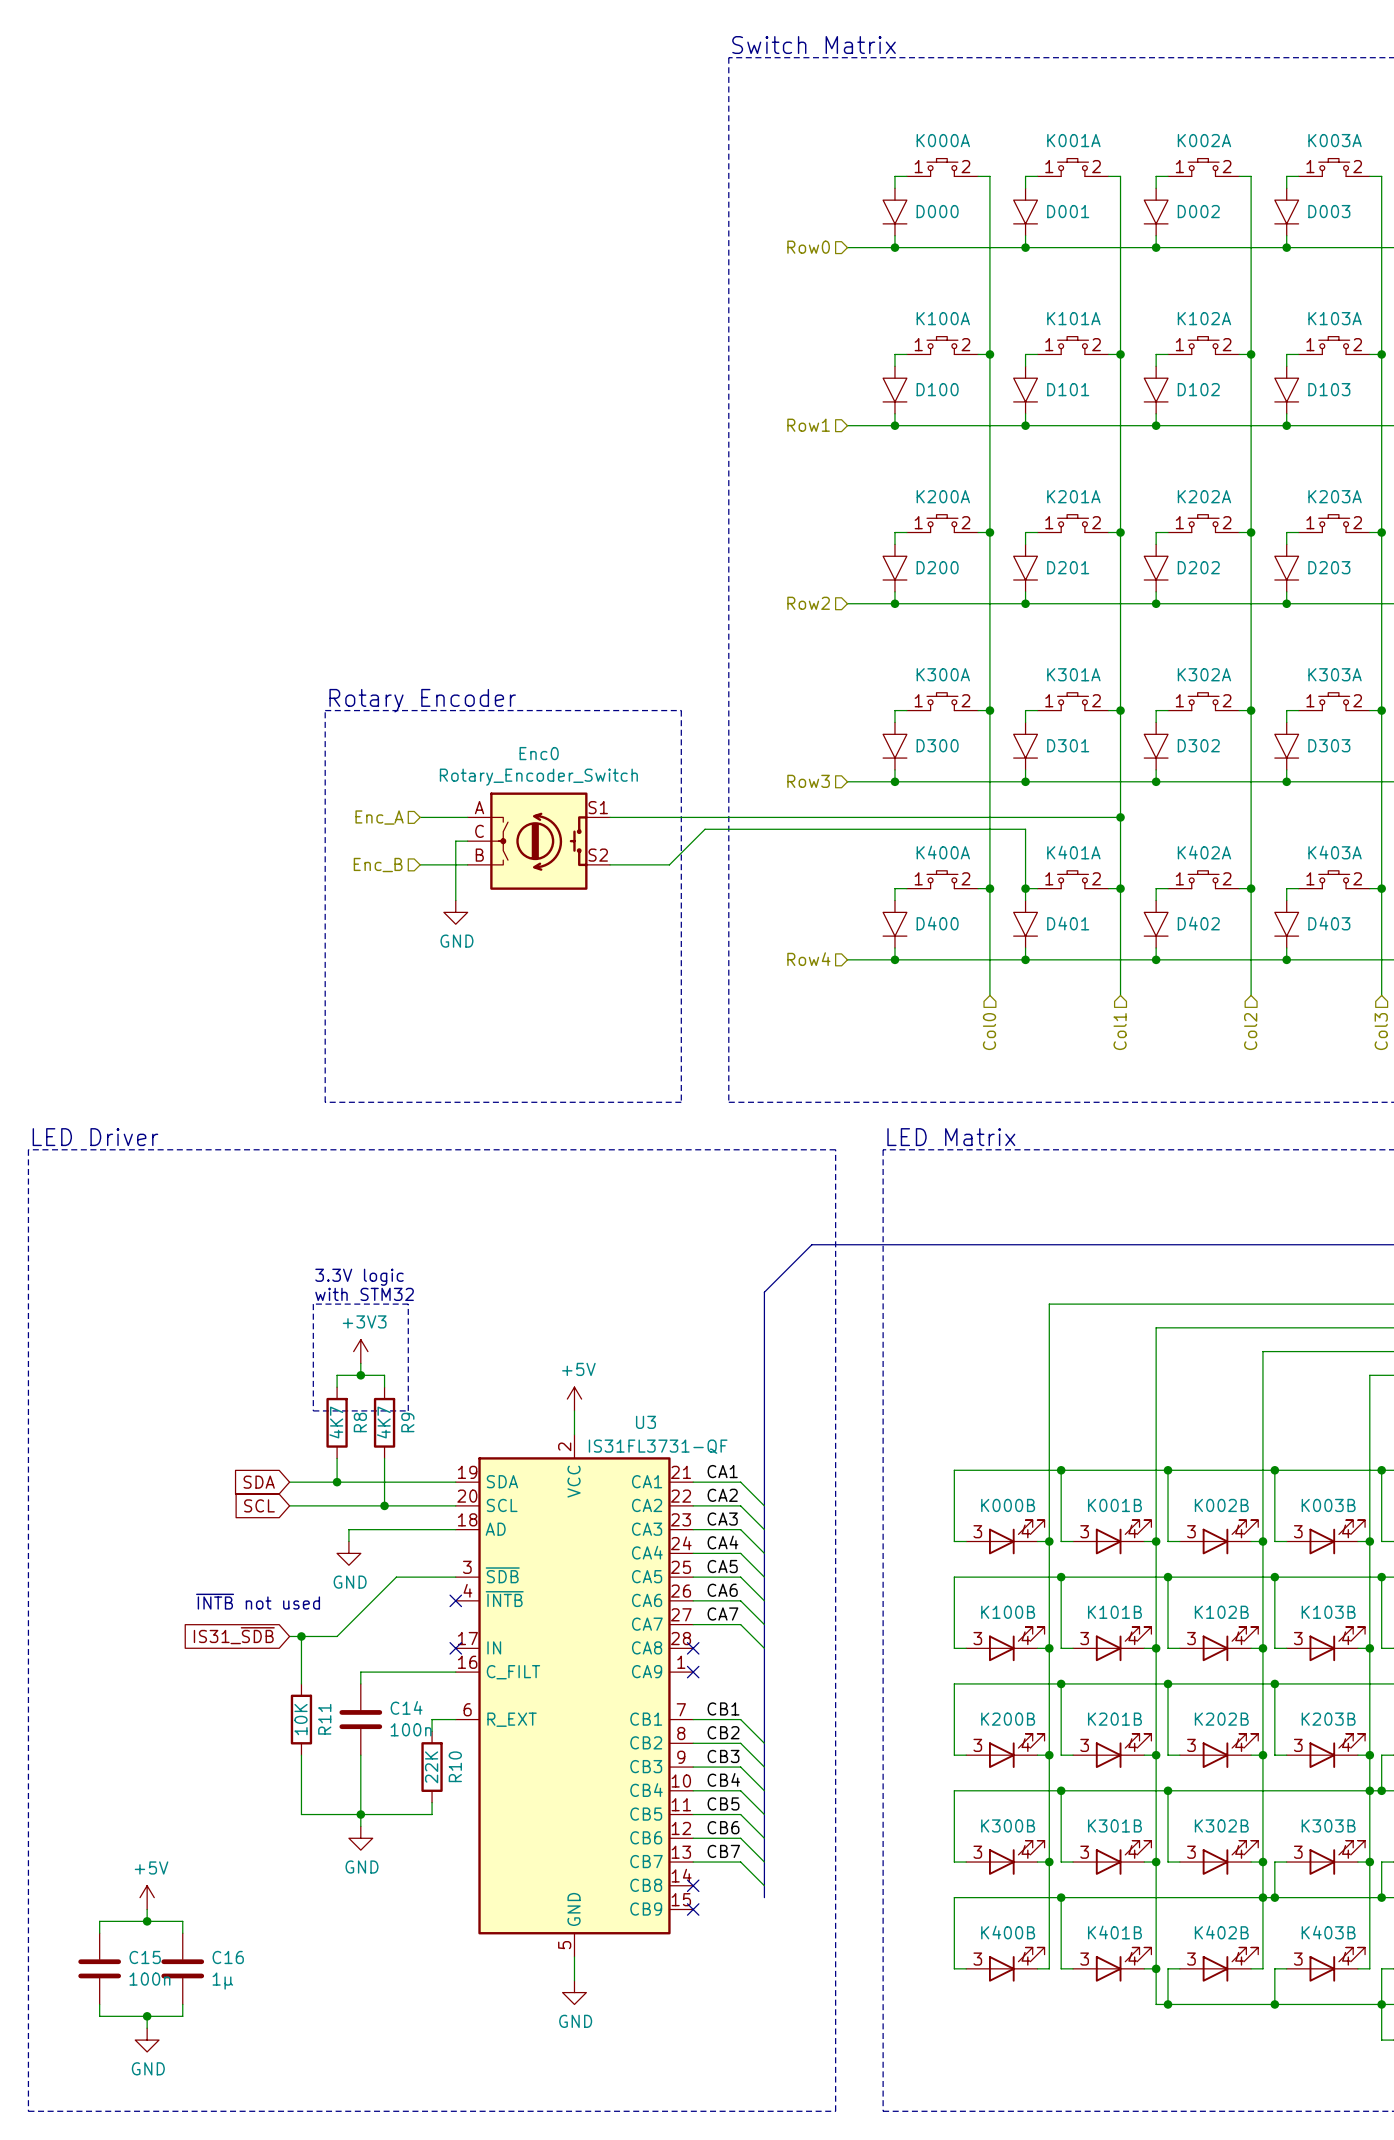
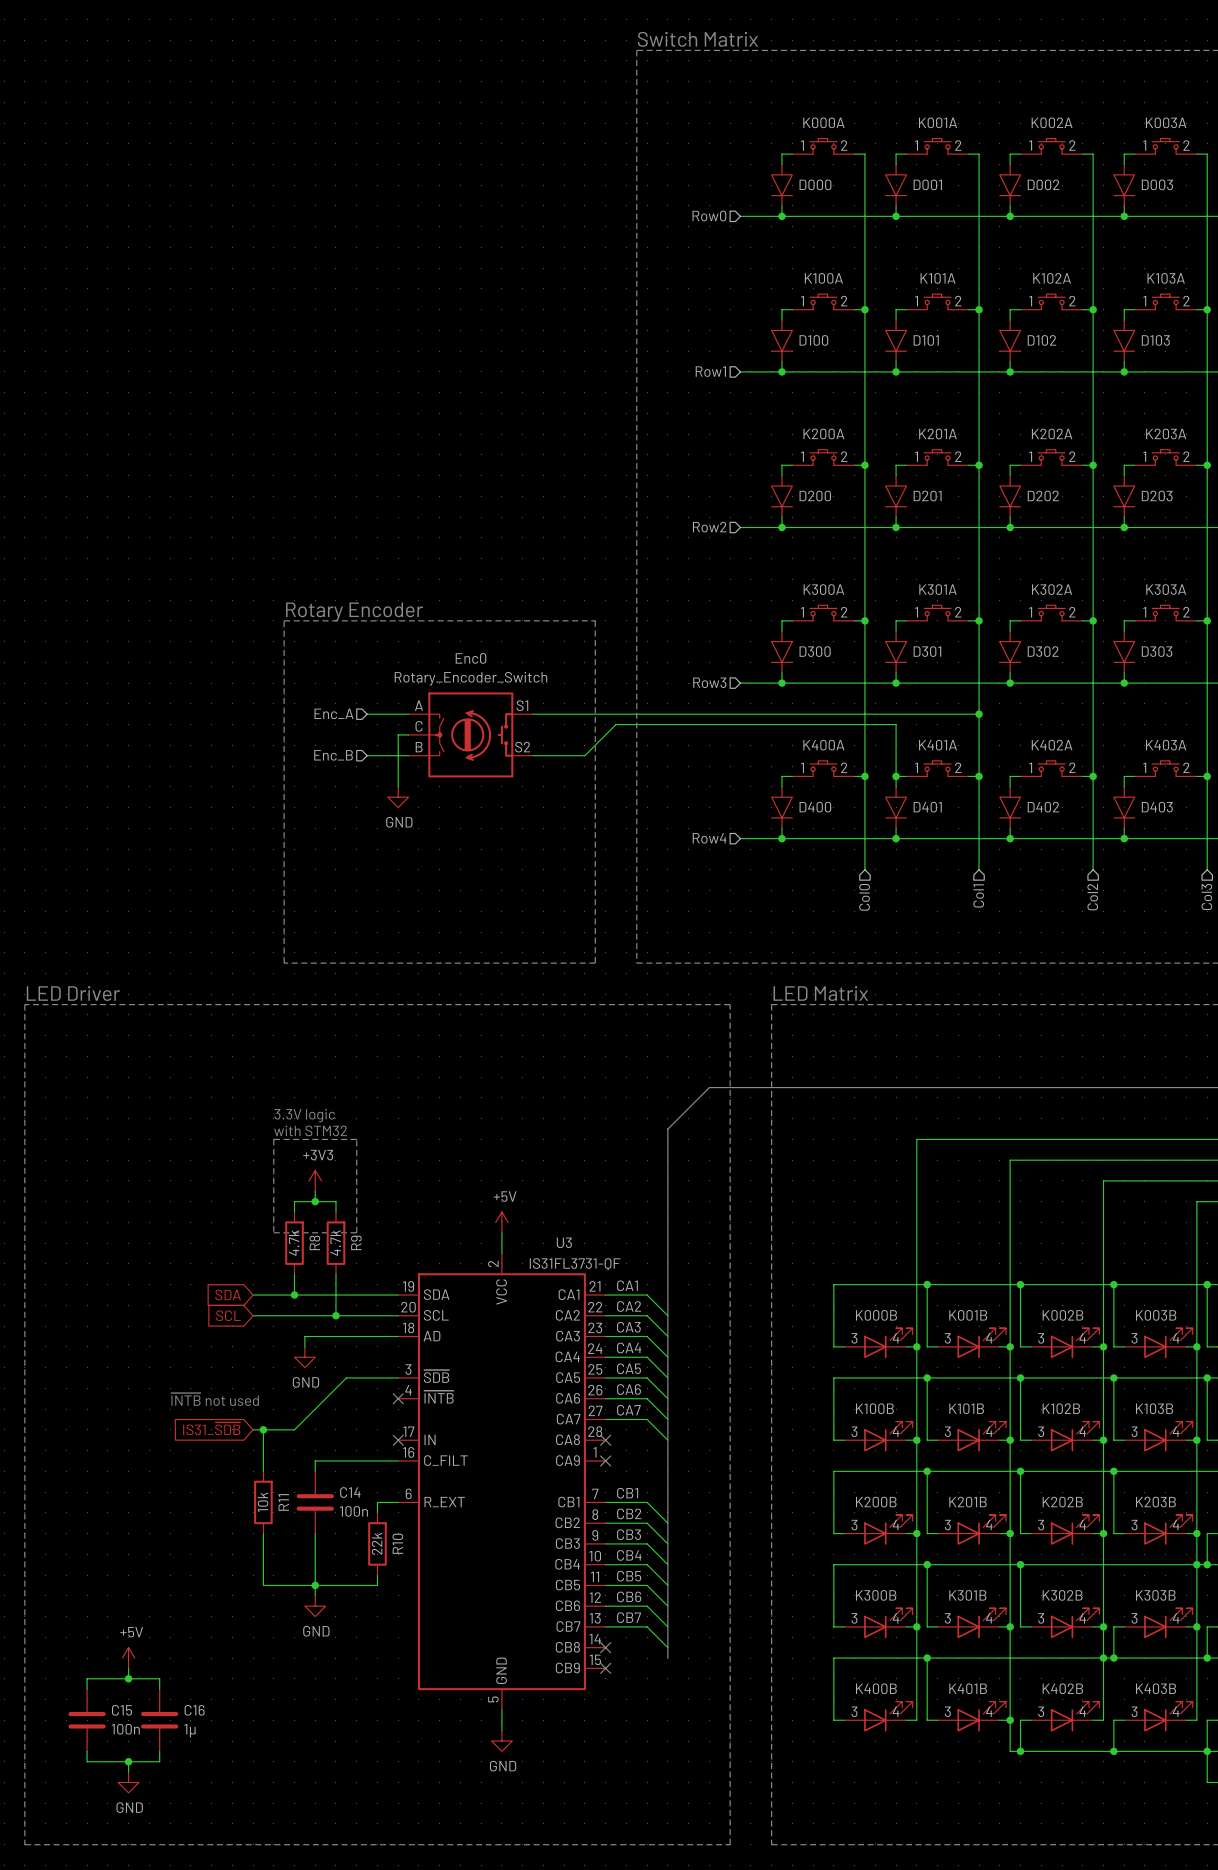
R8 value: 4K7 (336, 1422) -> 4.7k (294, 1243)
R9 value: 4K7 (383, 1422) -> 4.7k (335, 1243)
R11 value: 10K (301, 1719) -> 10k (263, 1502)
R10 value: 22K (431, 1767) -> 22k (377, 1543)

